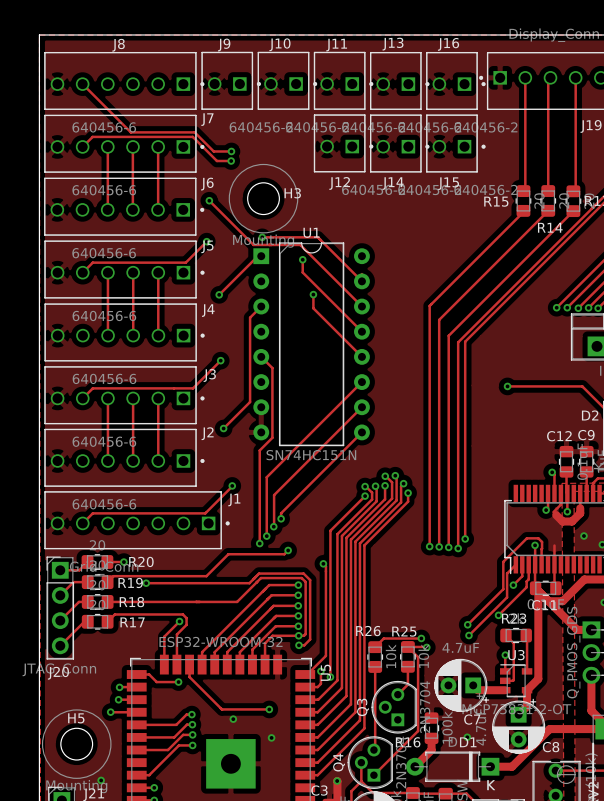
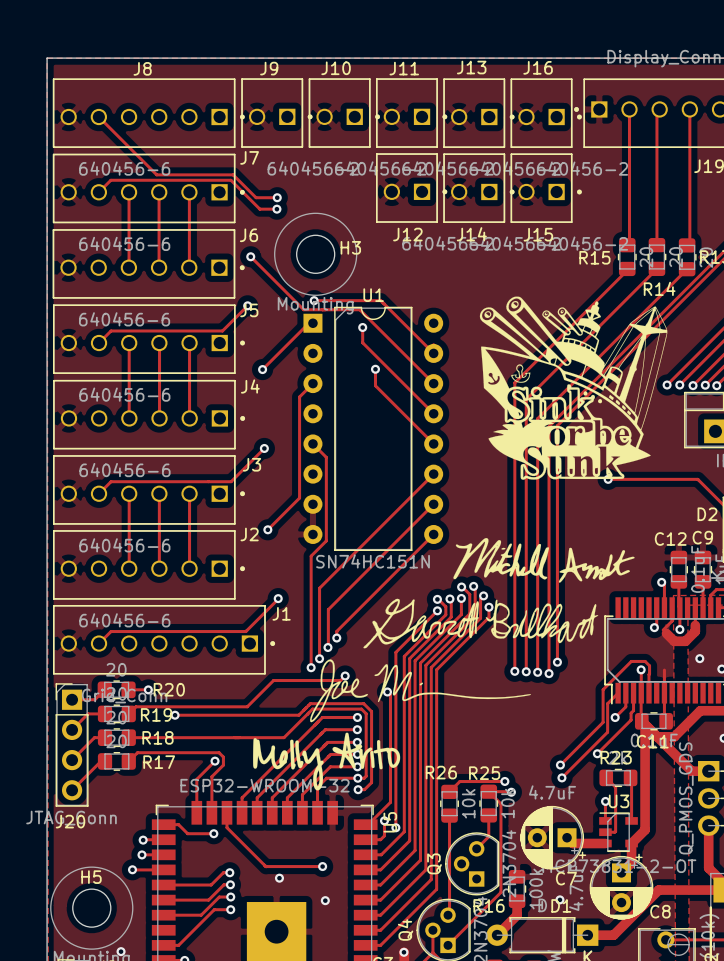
drawing: none -> [479, 296, 668, 480]
drawing: none -> [453, 538, 635, 583]
drawing: none -> [253, 598, 599, 791]

